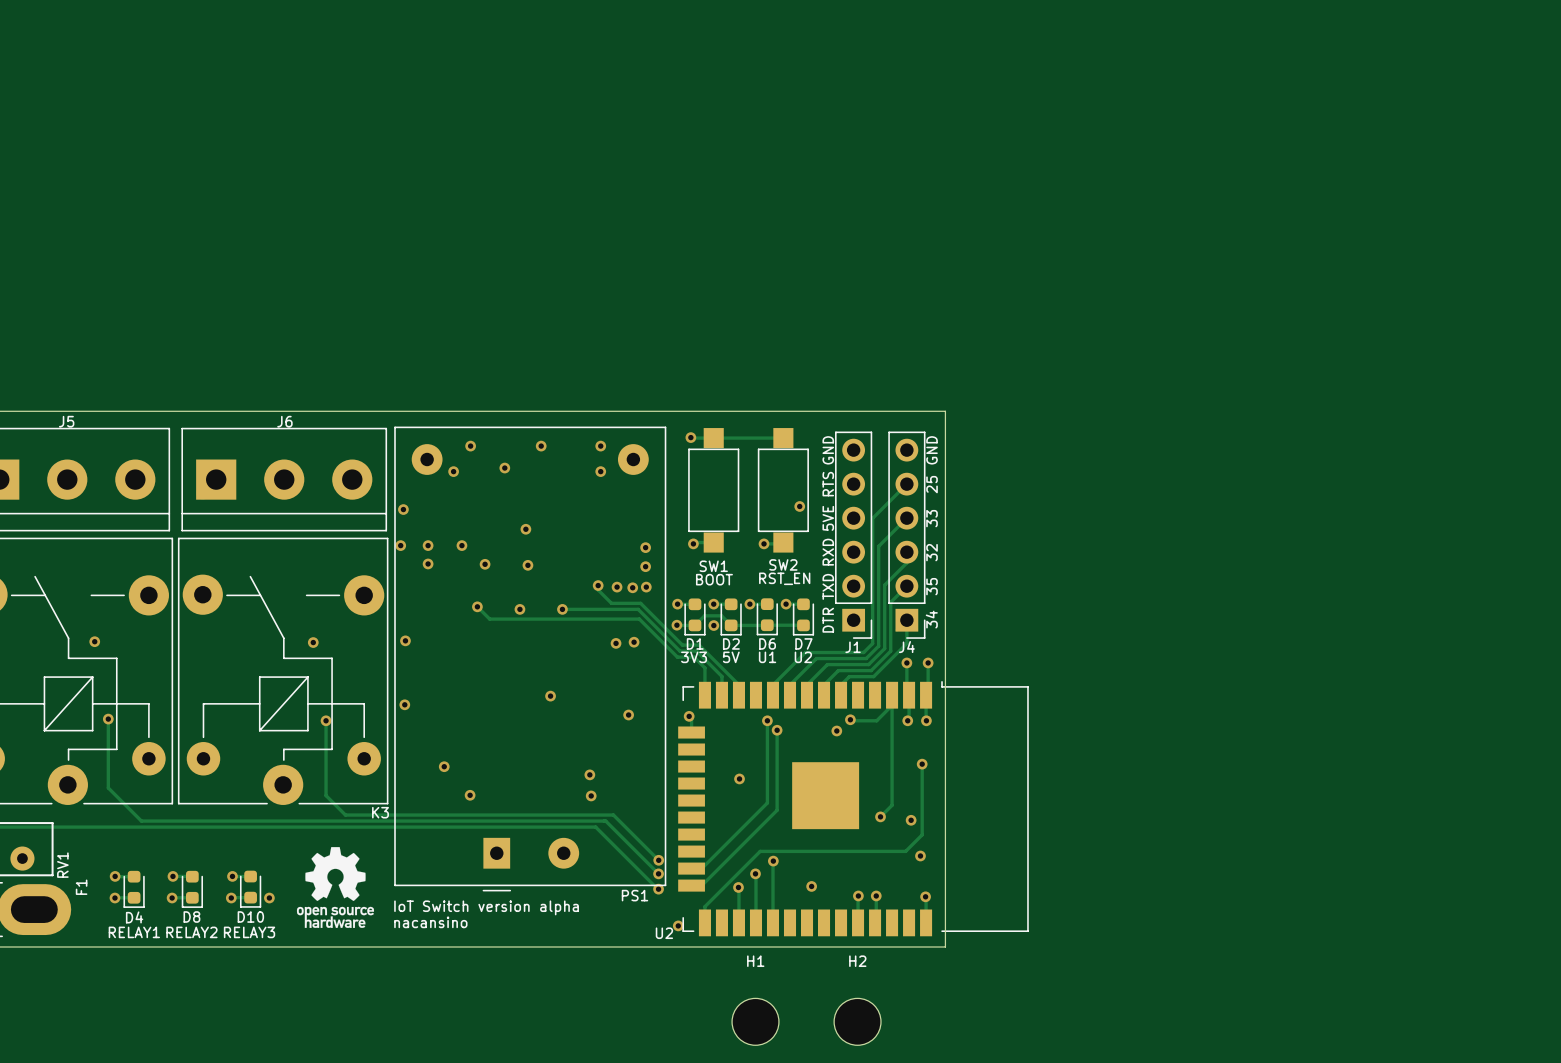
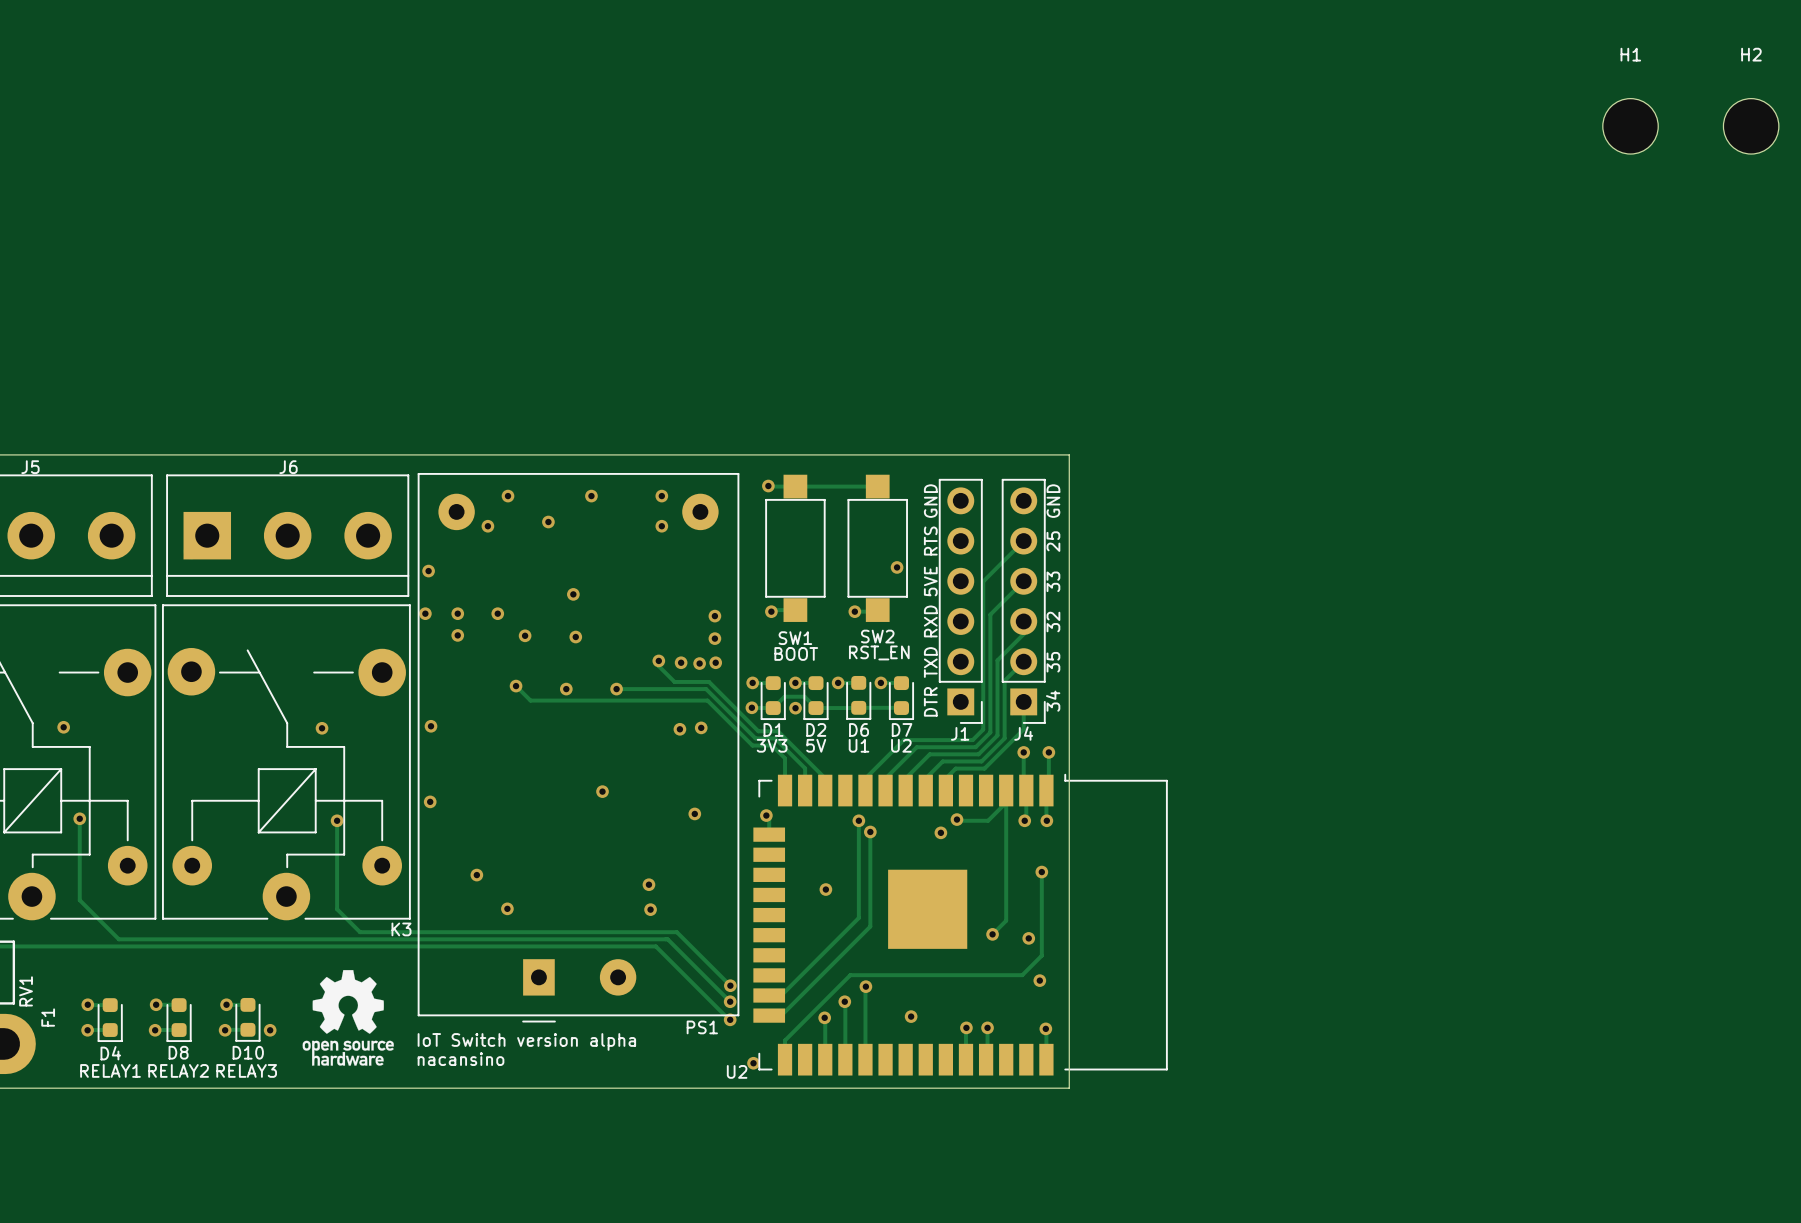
H1 position: (755, 1021) -> (1630, 126)
H2 position: (857, 1021) -> (1751, 126)

